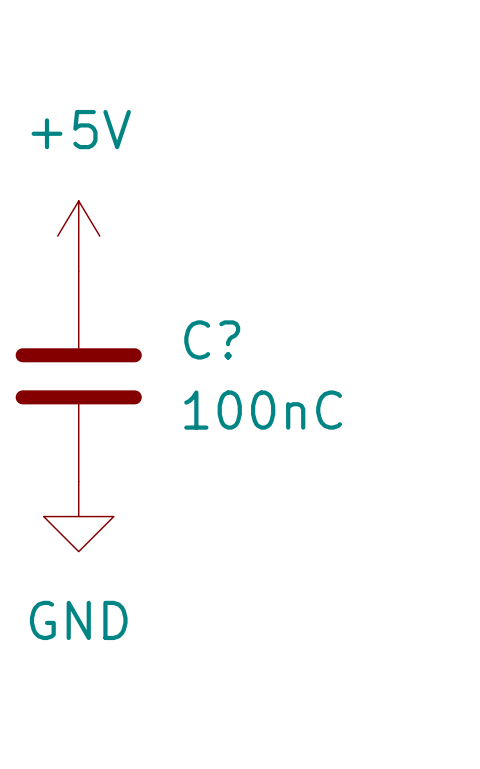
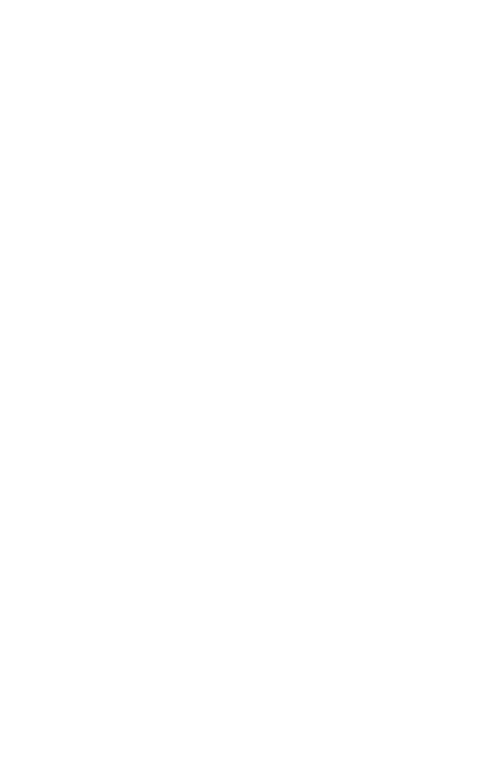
power symbol: +5V (78, 236) -> none
C?: 100nC (78, 376) -> none
power symbol: GND (78, 516) -> none

